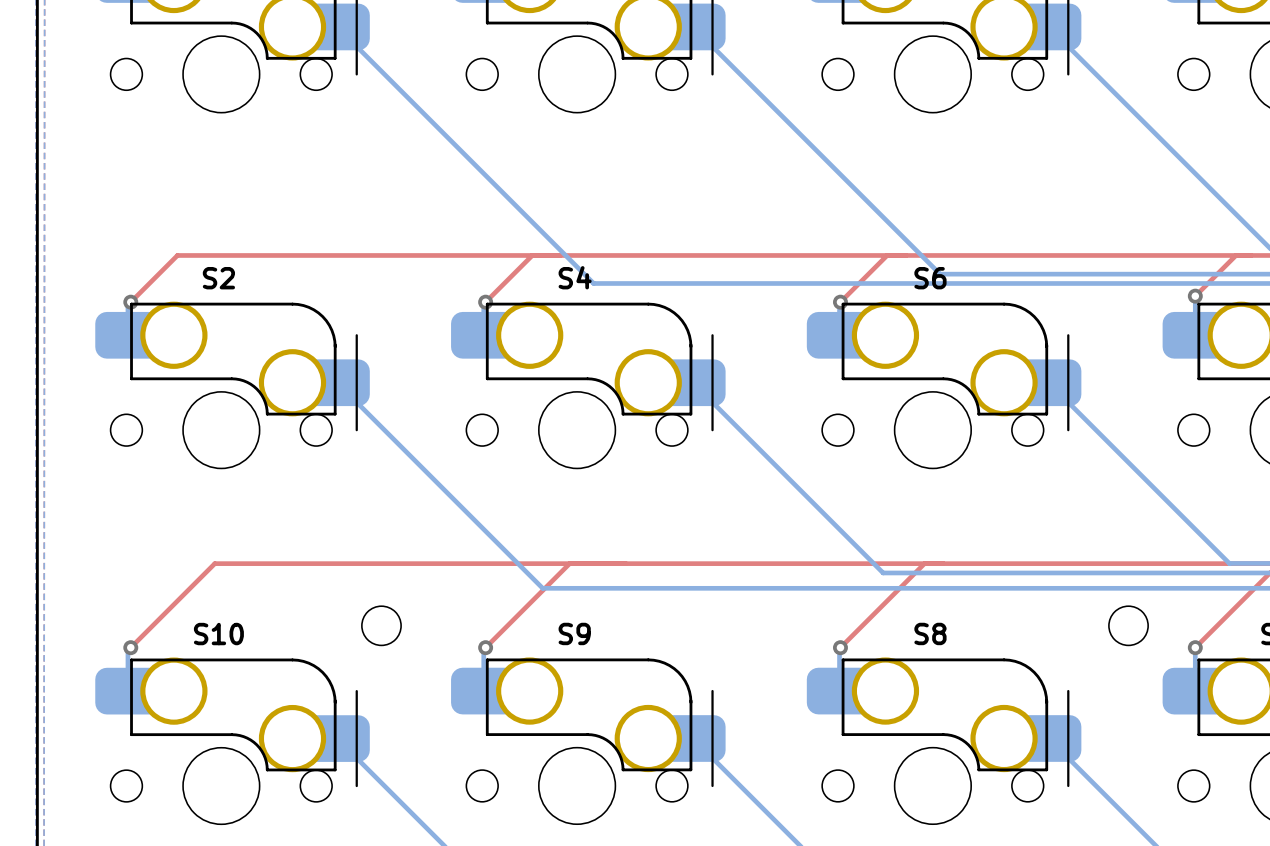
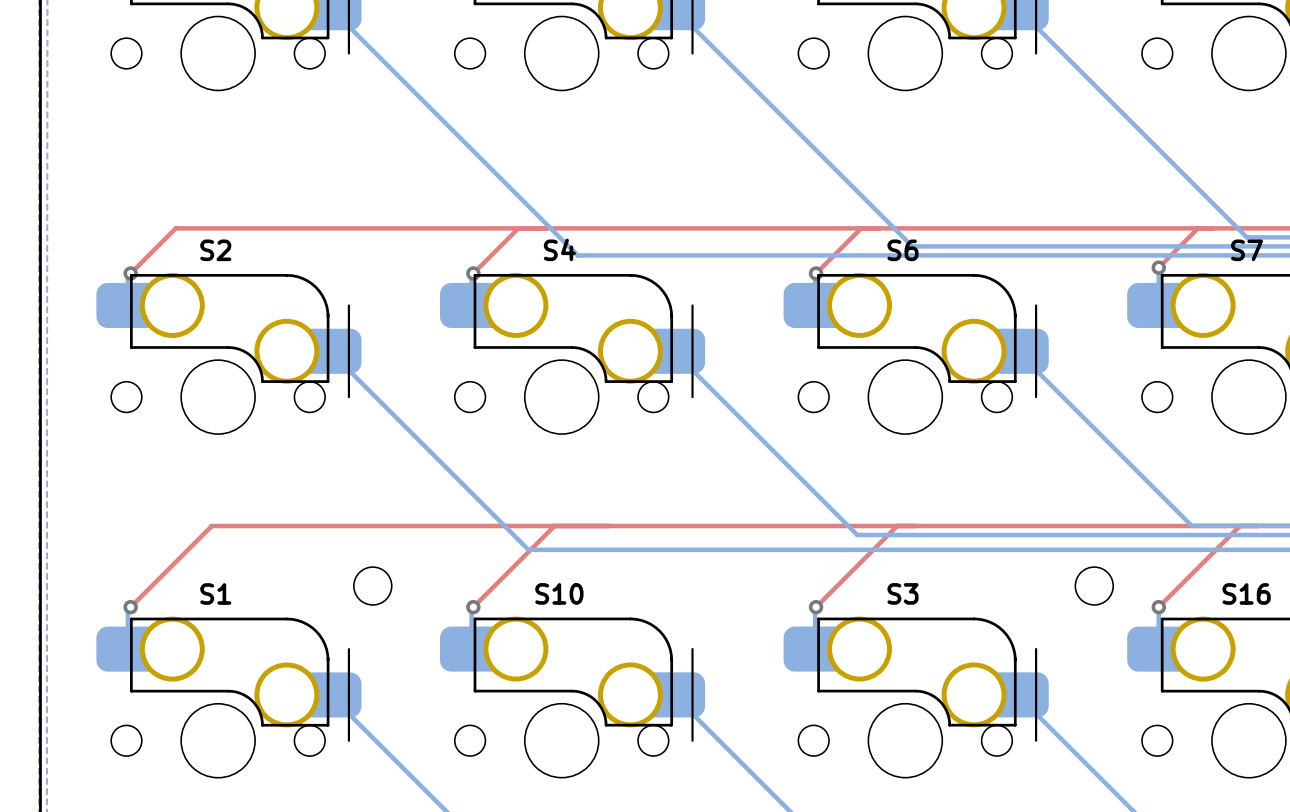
S9 name: S9 (574, 633) -> S10 (559, 593)
S8 name: S8 (930, 633) -> S3 (902, 593)
S10 name: S10 (218, 634) -> S1 (215, 593)

